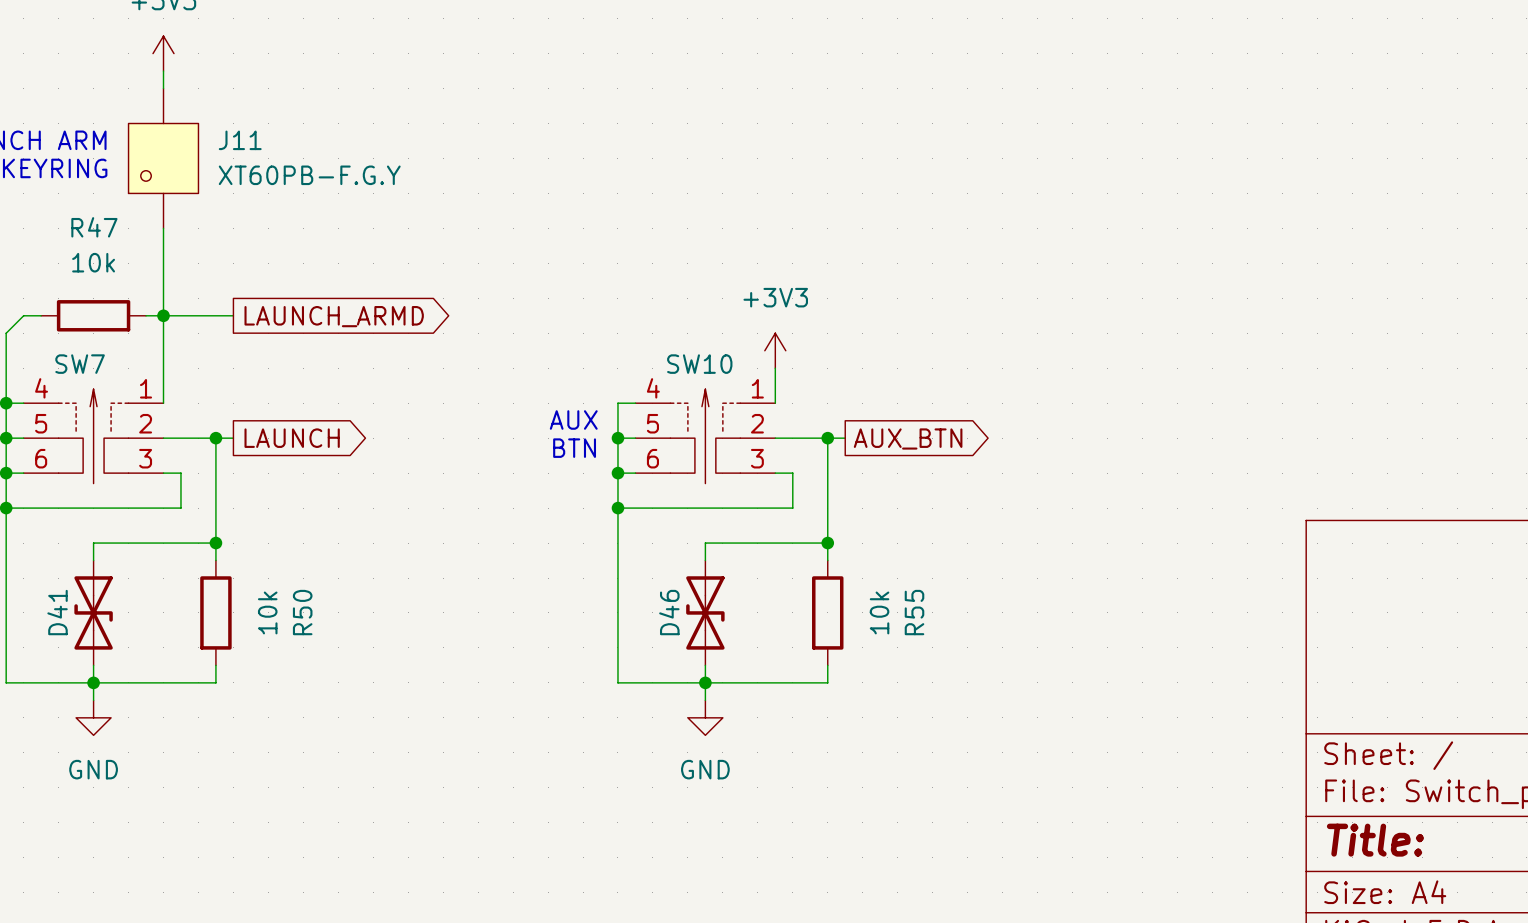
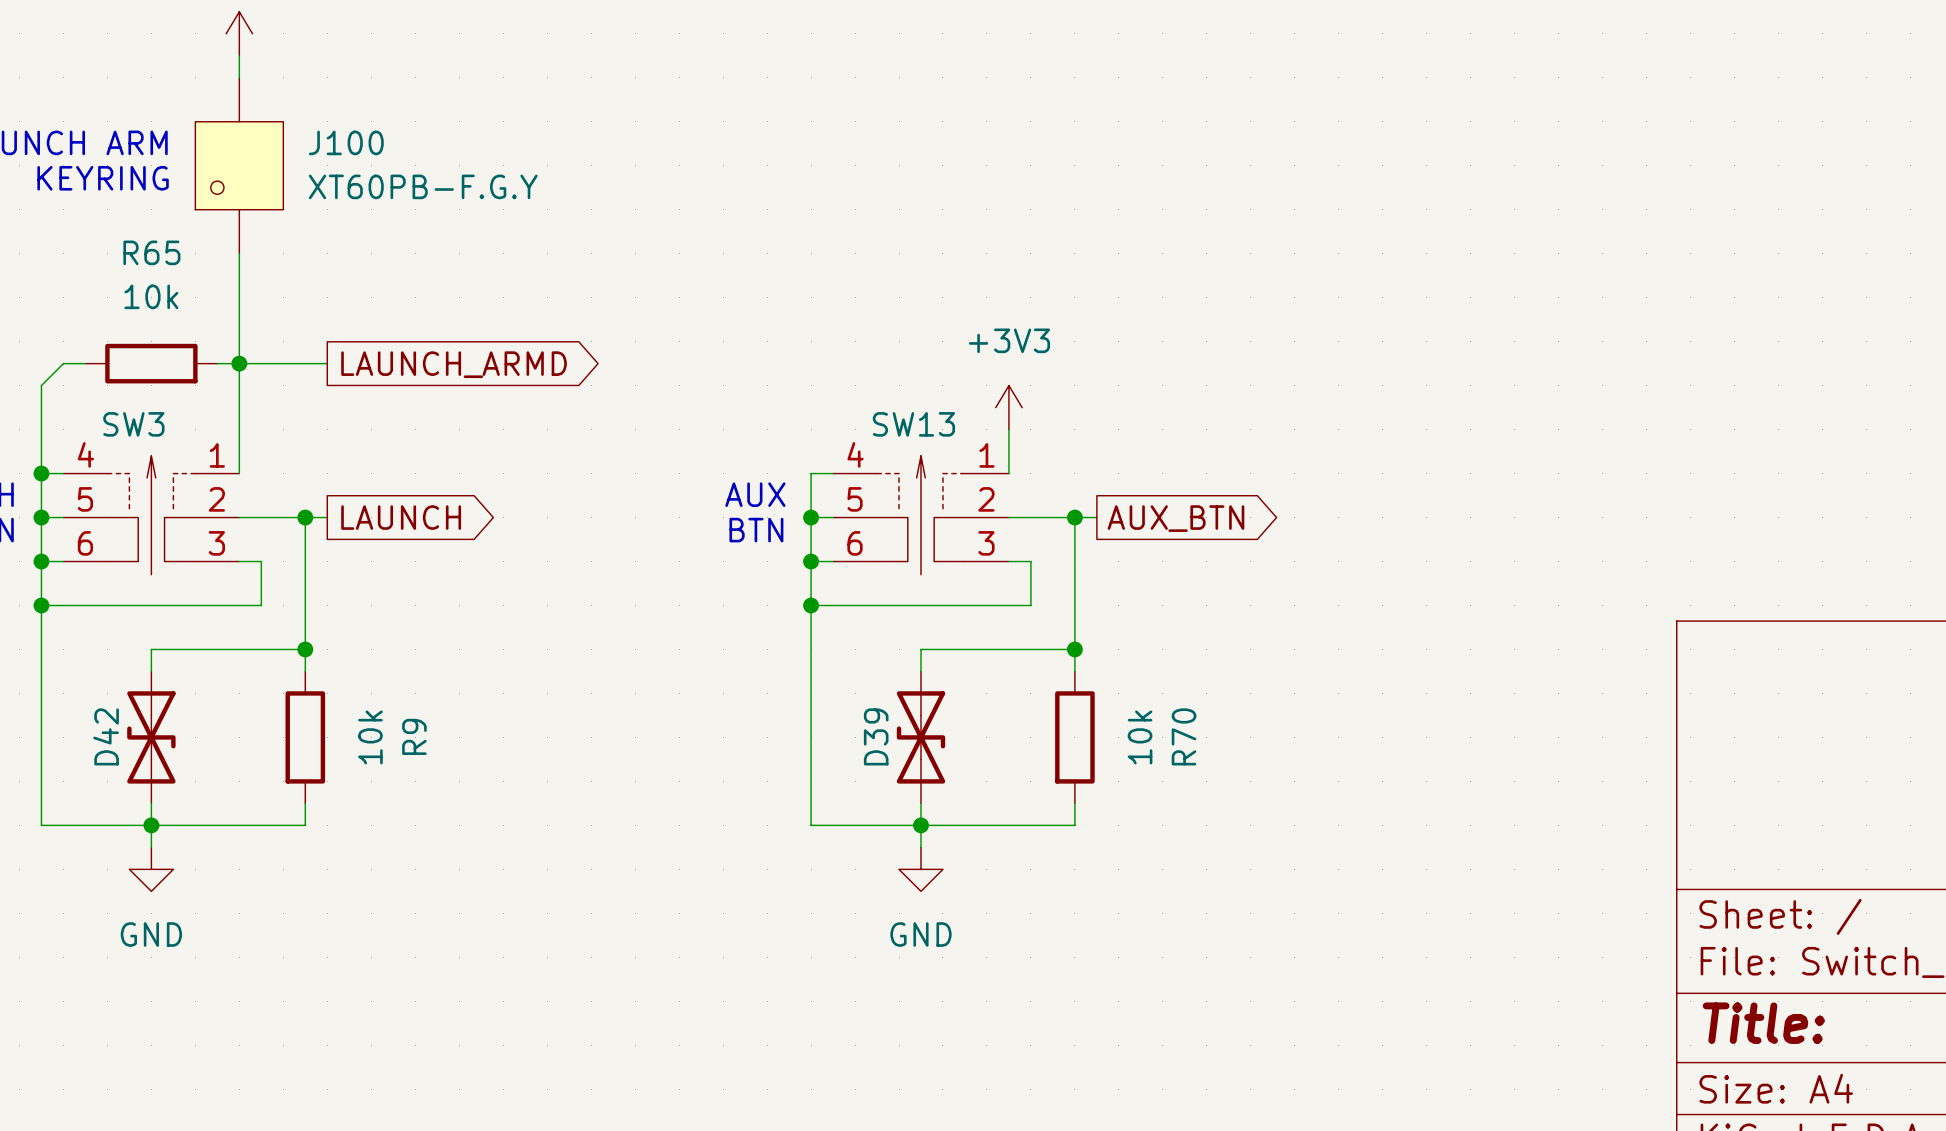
J11 name: J11 (240, 140) -> J100 (346, 142)
R47 name: R47 (94, 227) -> R65 (151, 252)
SW7 name: SW7 (80, 364) -> SW3 (133, 424)
SW10 name: SW10 (699, 364) -> SW13 (913, 424)
D41 name: D41 (57, 612) -> D42 (106, 736)
R50 name: R50 (302, 612) -> R9 (414, 736)
D46 name: D46 (669, 612) -> D39 (876, 736)
R55 name: R55 (914, 612) -> R70 (1184, 736)

